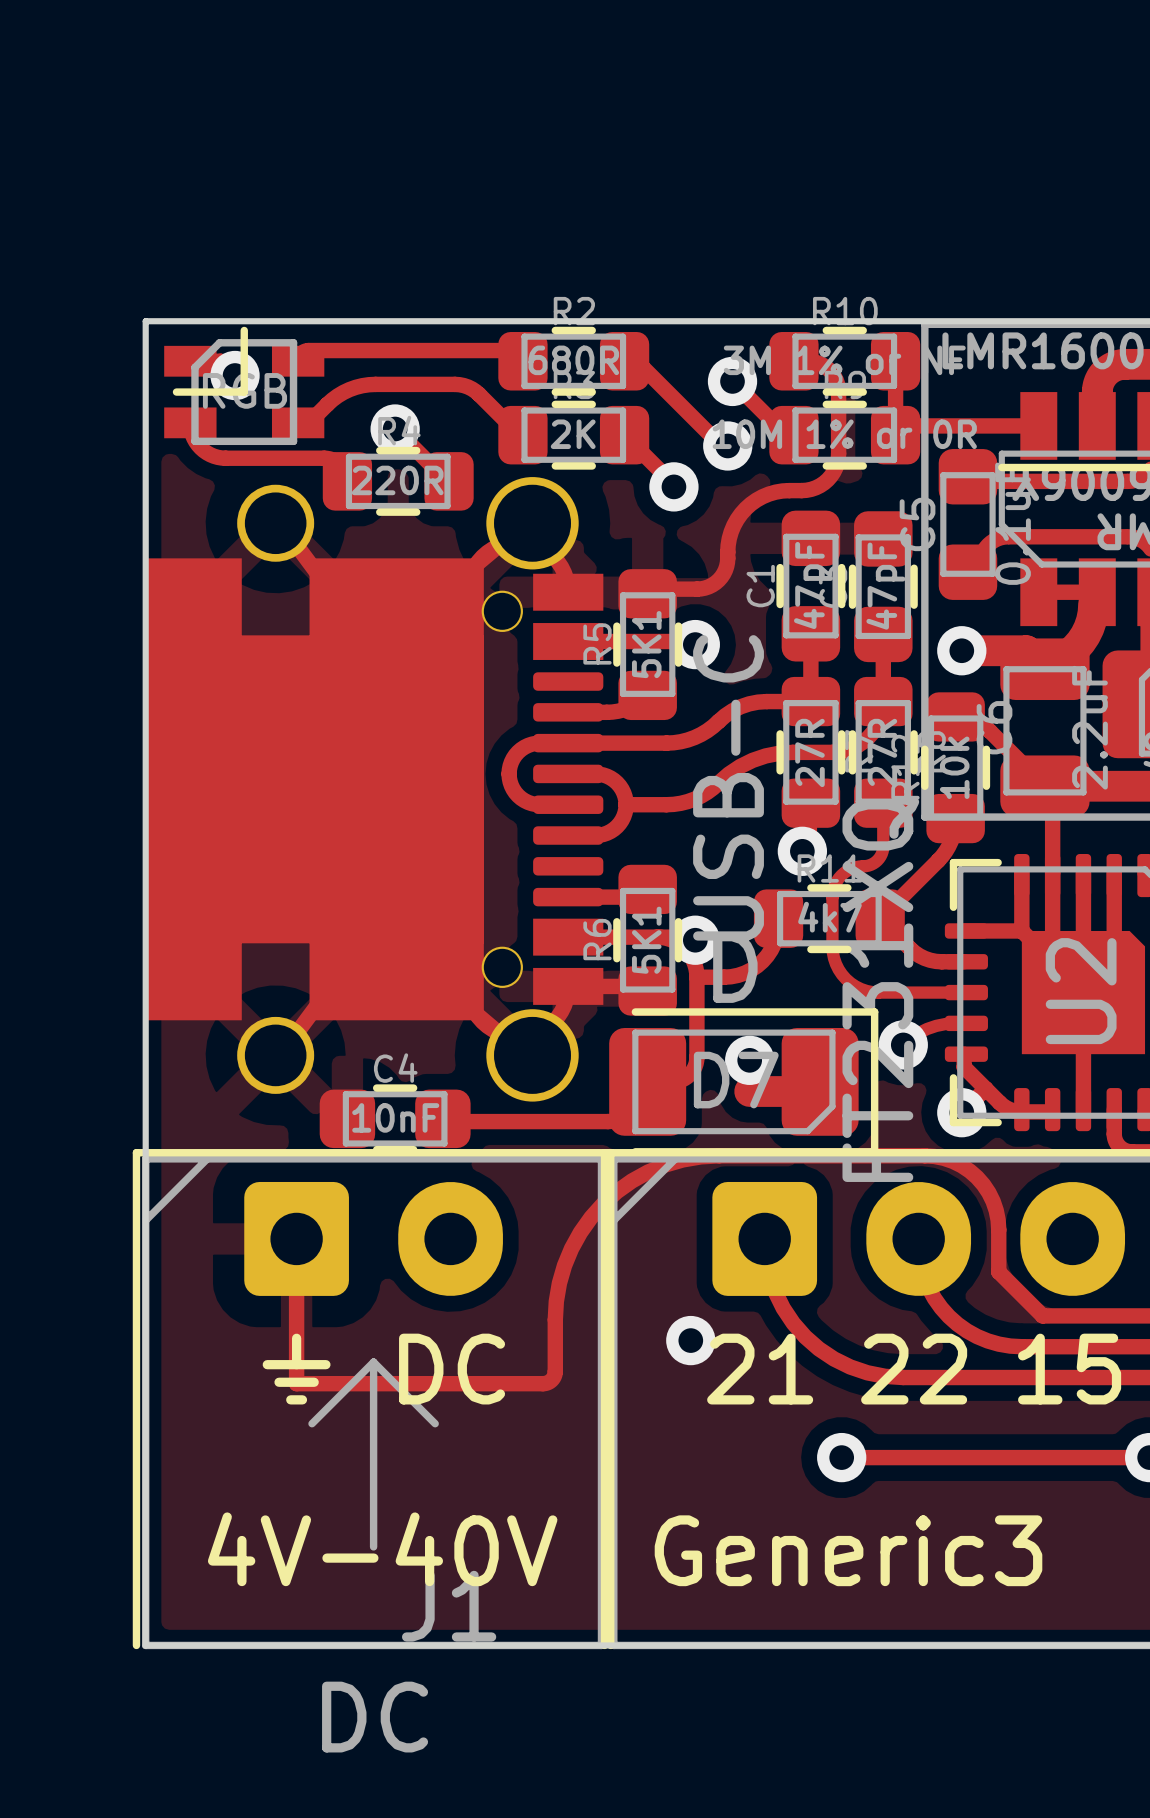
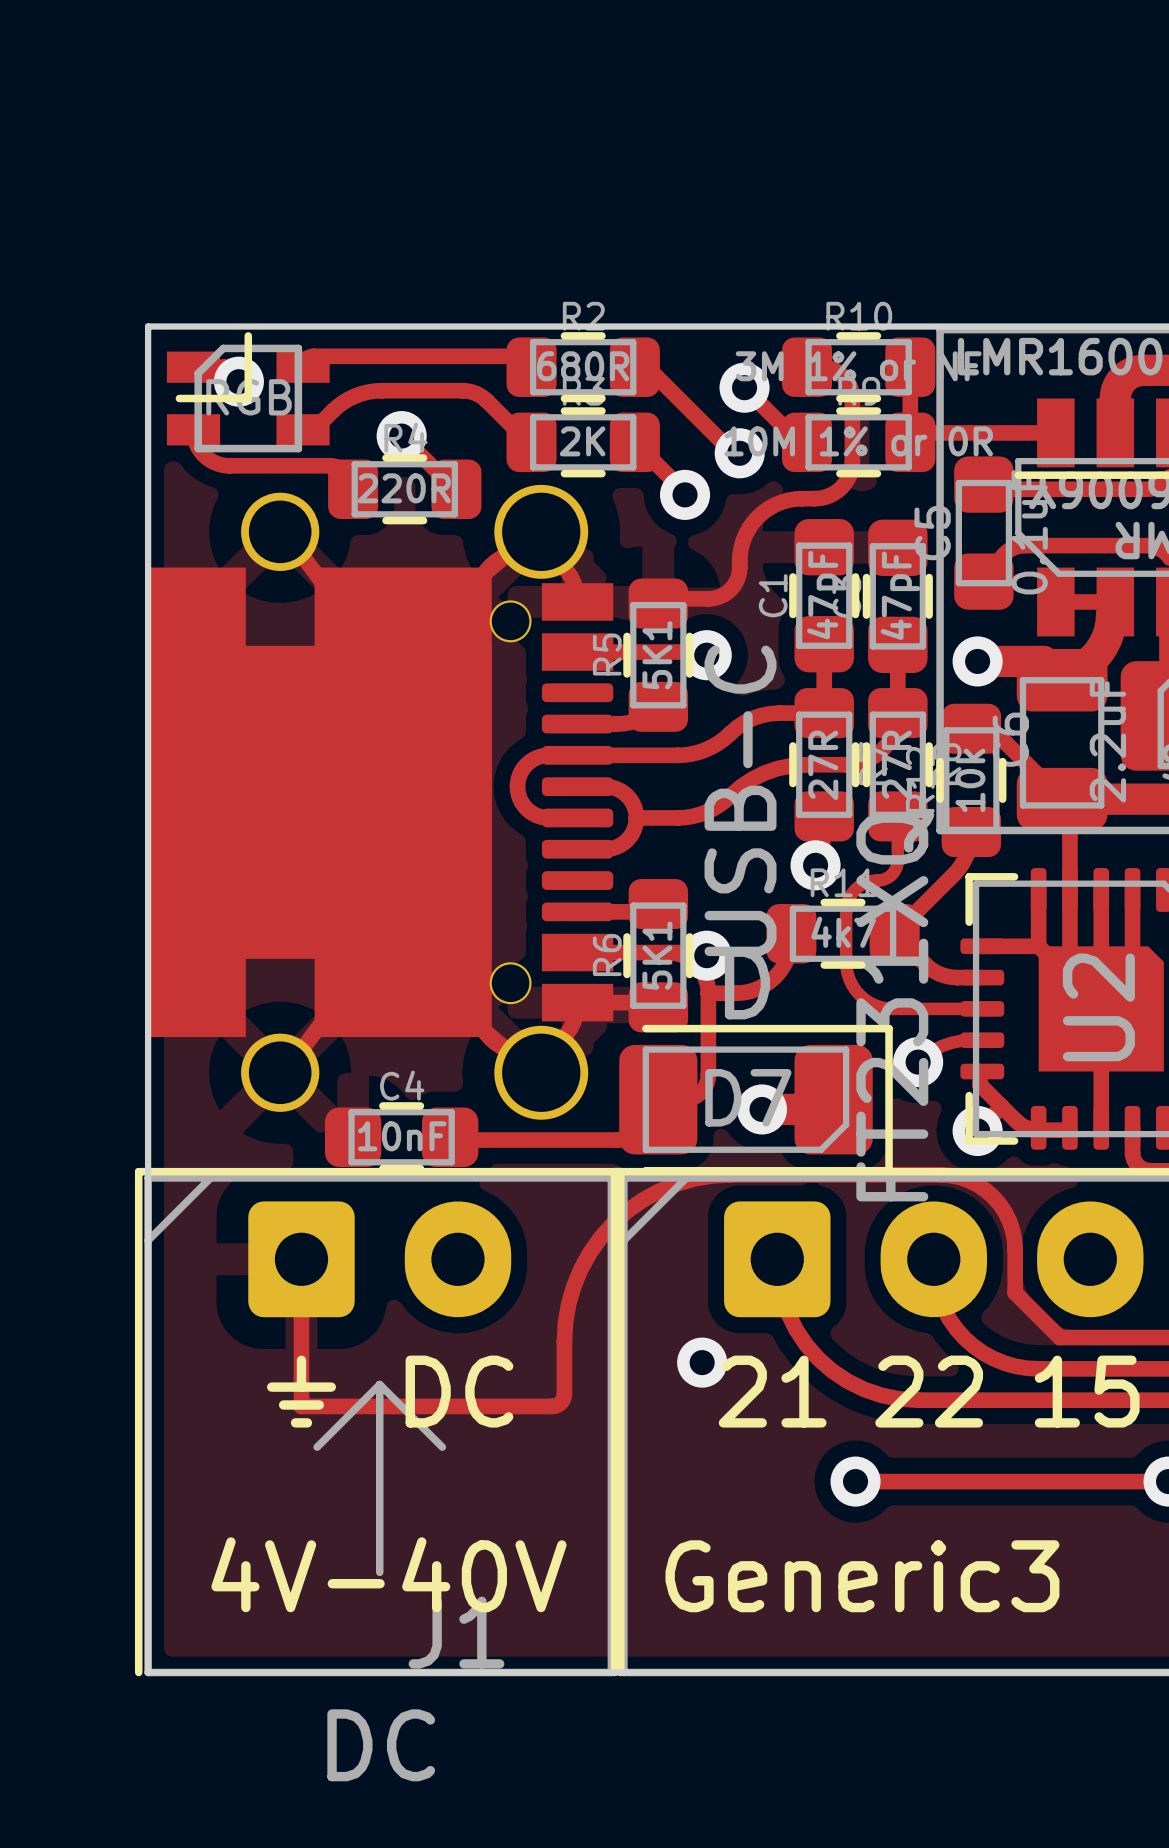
via position: (749, 1060) -> (762, 1109)

